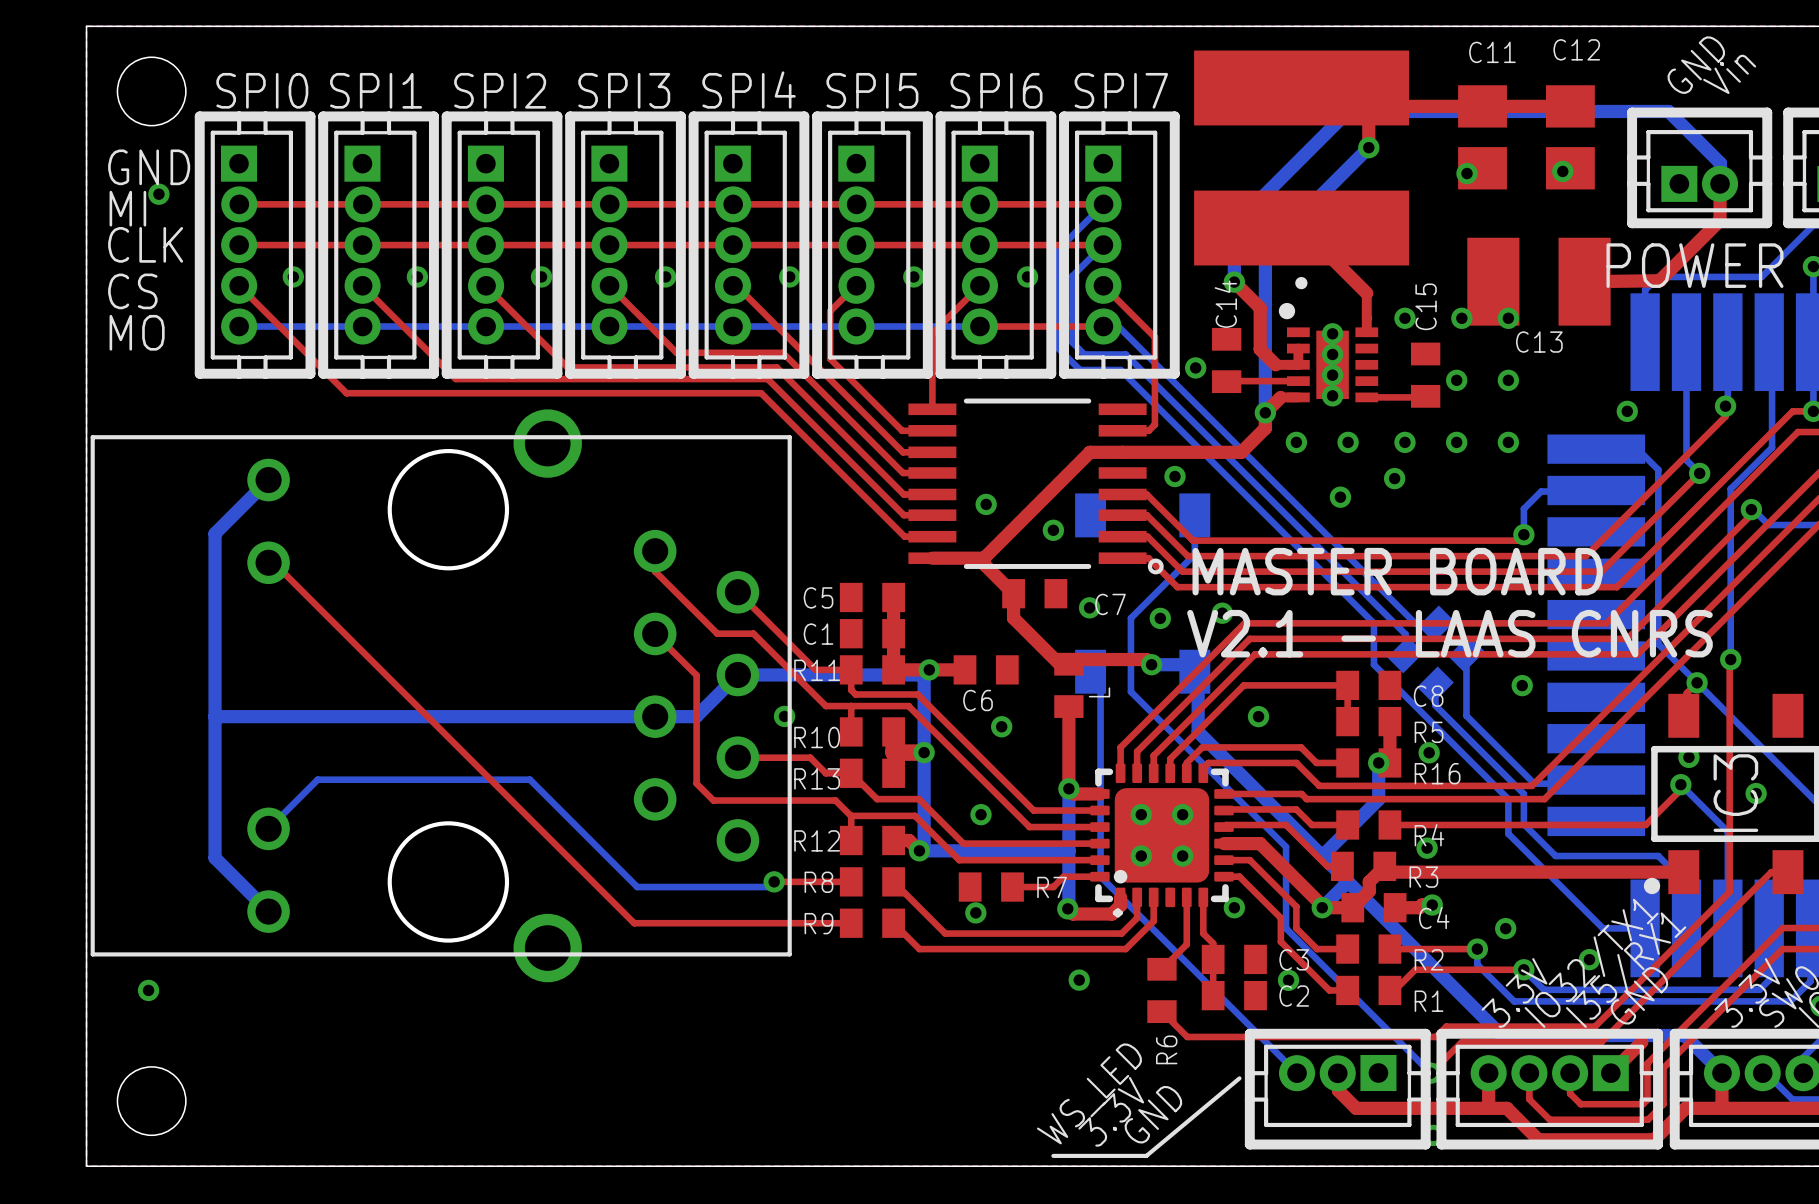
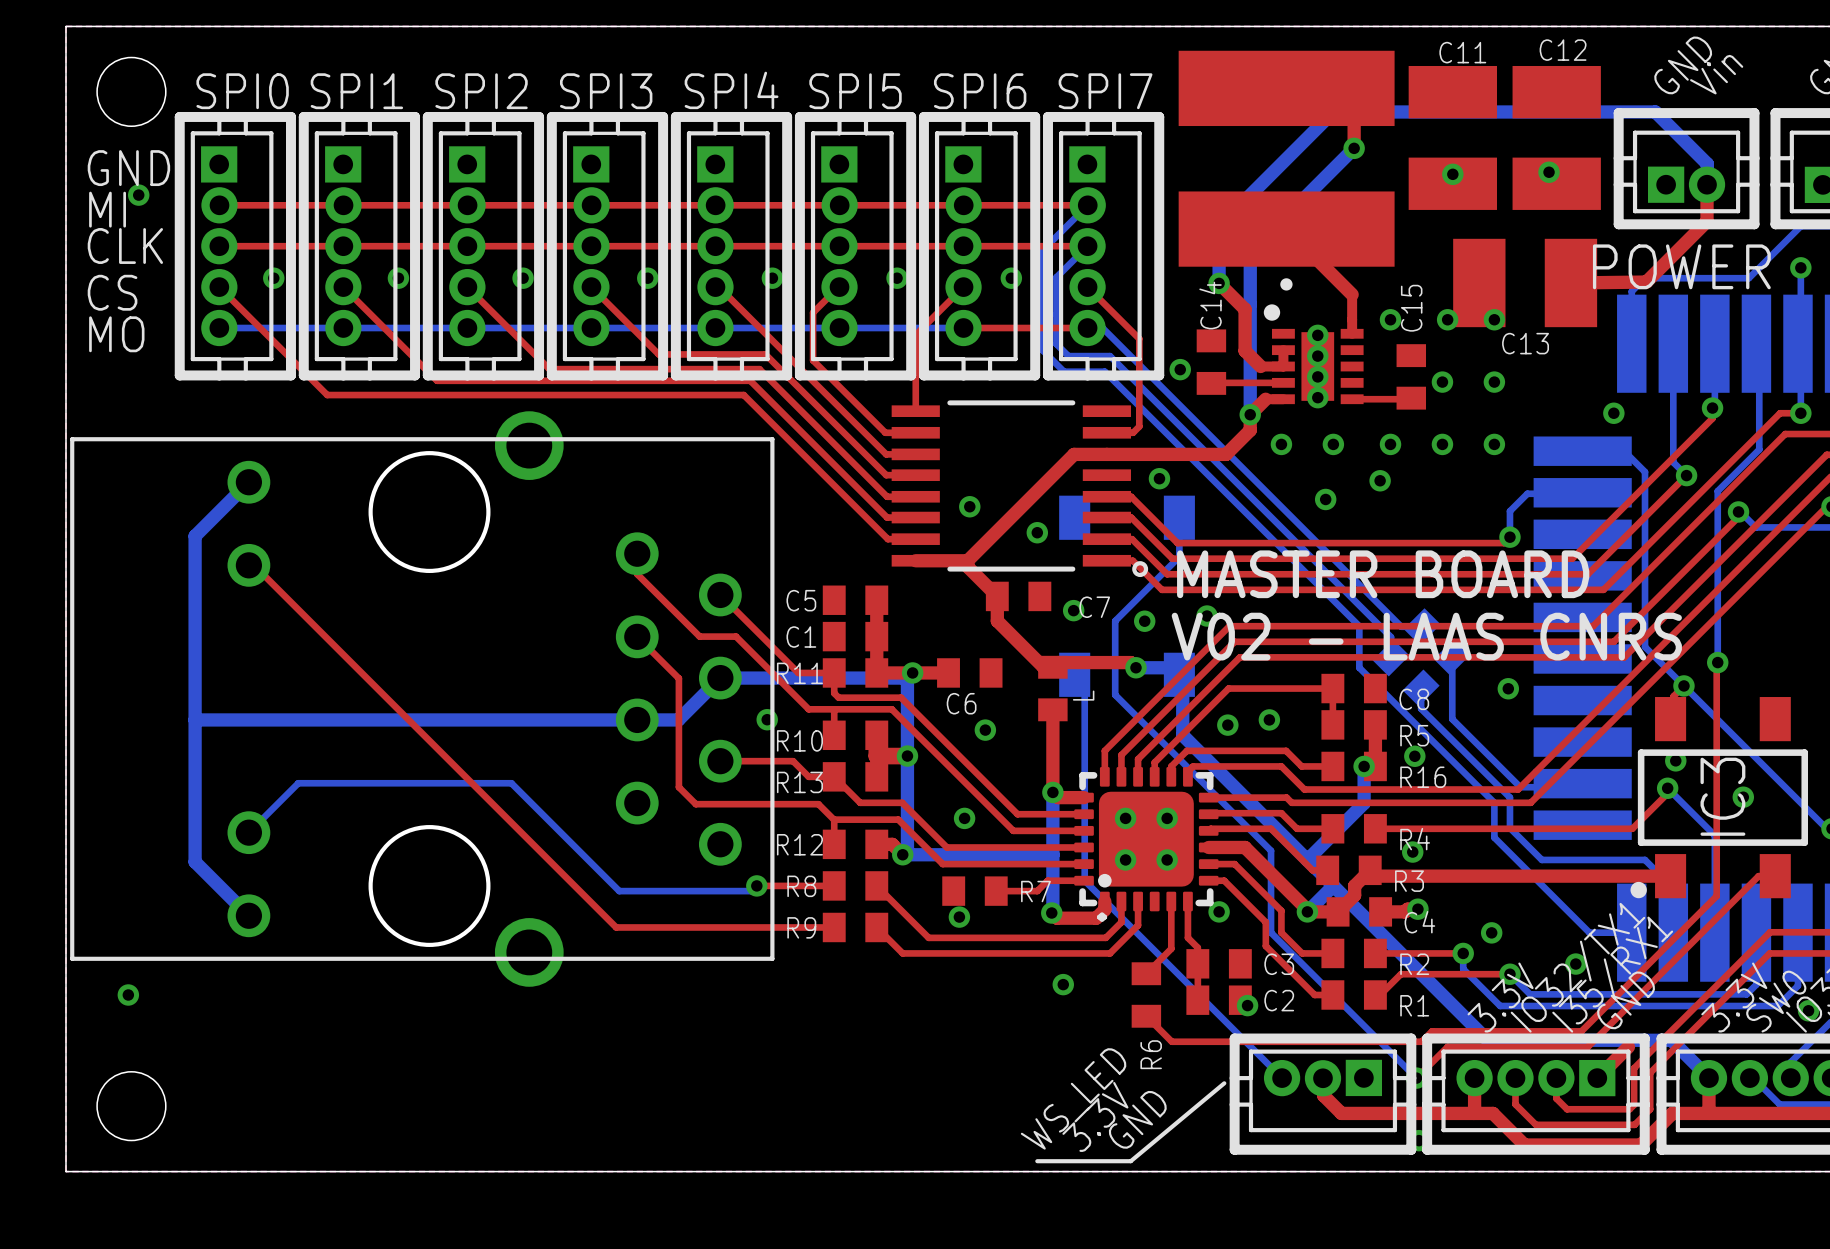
C11 footprint: [1458, 85, 1507, 190] -> [1408, 65, 1498, 210]
C12 footprint: [1545, 85, 1595, 190] -> [1512, 65, 1601, 210]
top track: (1368, 106) (1570, 106) -> none
text: V2.1 - LAAS CNRS (1449, 633) -> V02 - LAAS CNRS (1426, 636)
via position: (1258, 716) -> (1227, 725)
via: none -> (1269, 719)
via position: (1288, 980) -> (1247, 1005)

